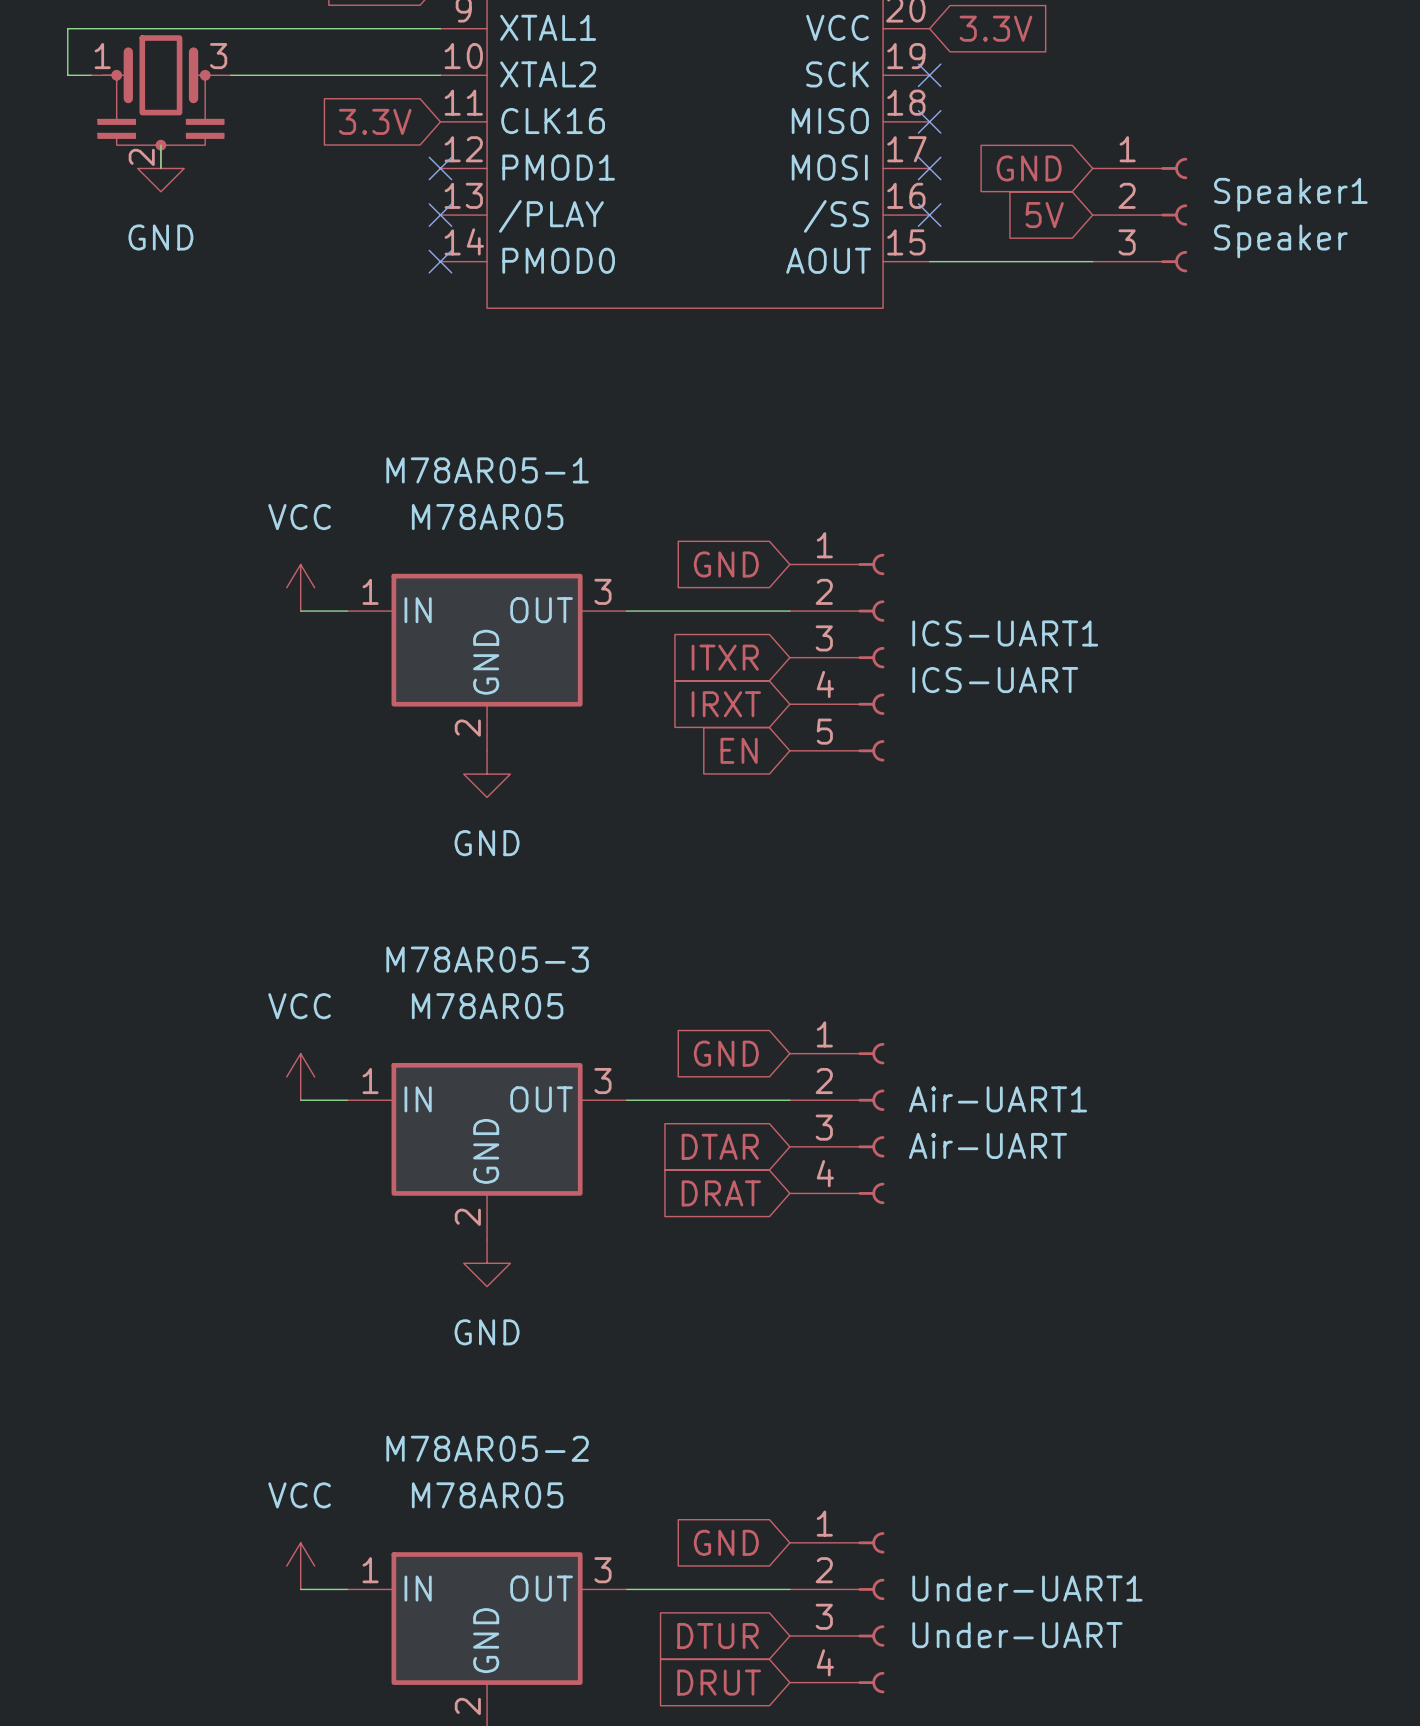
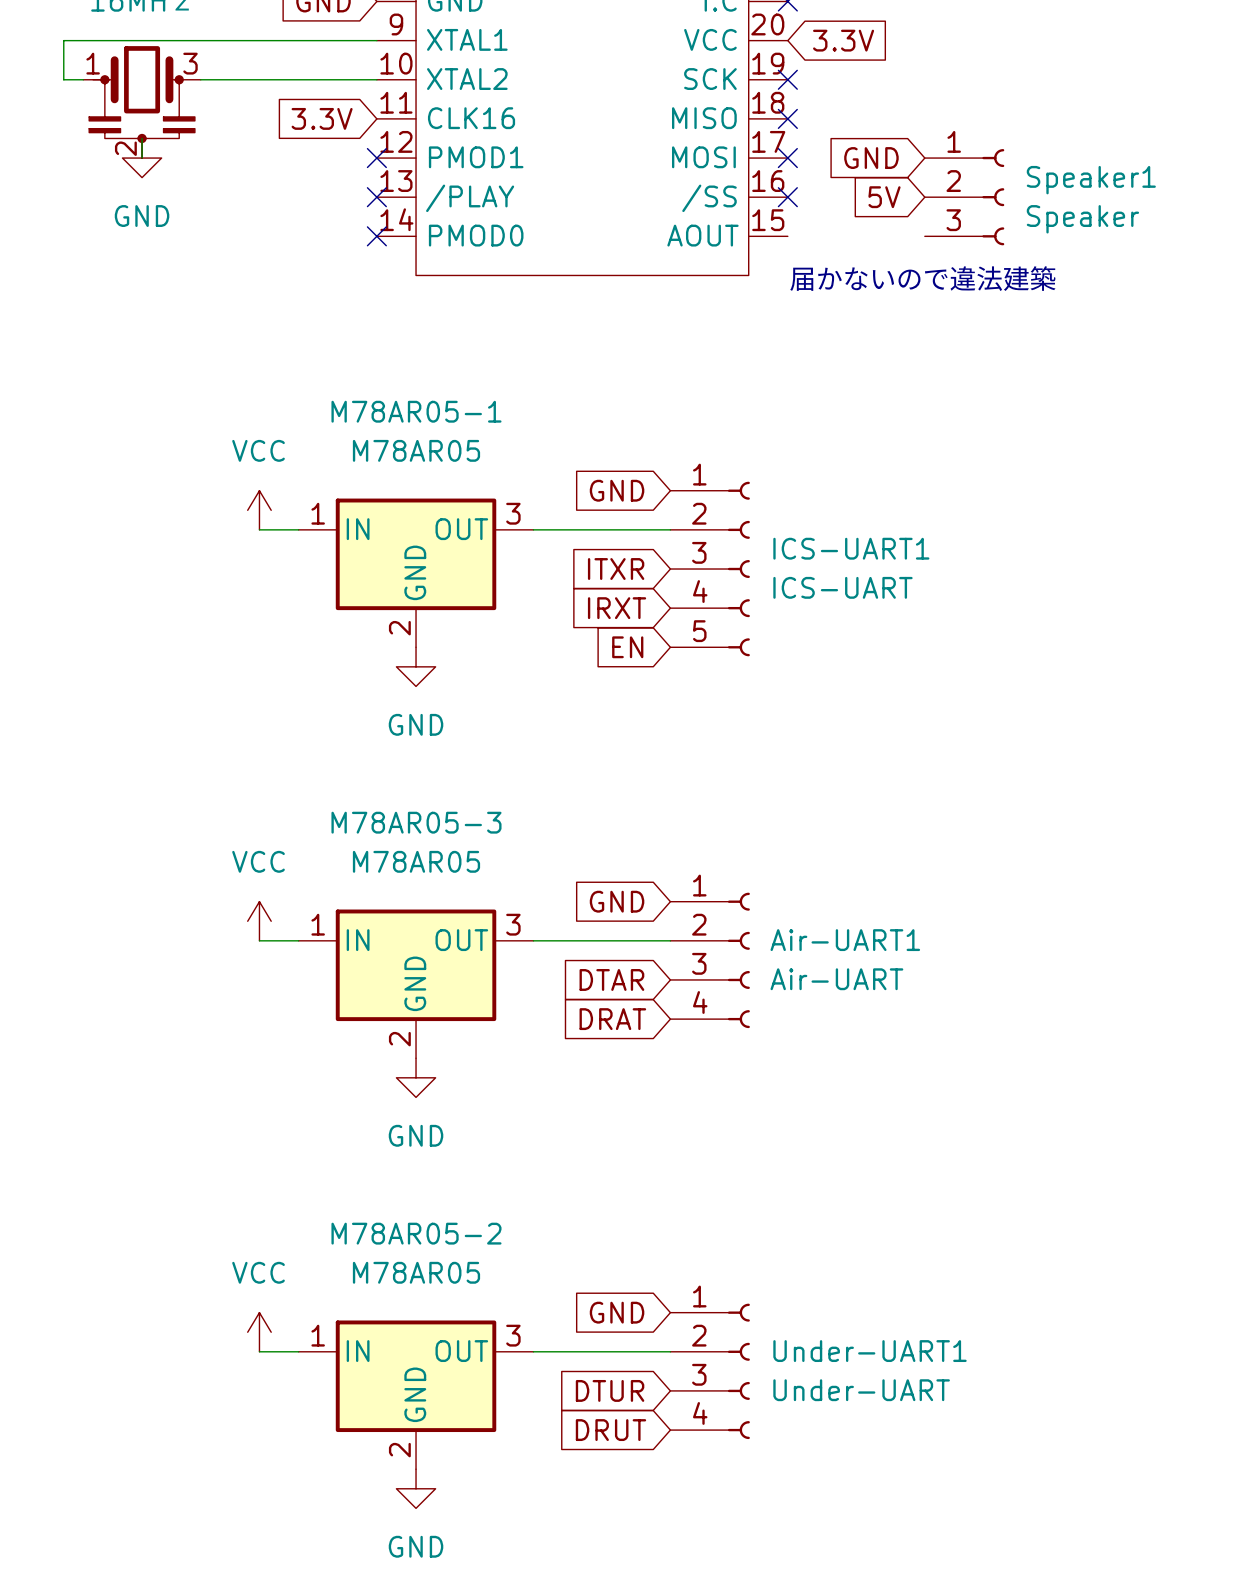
wire: (929, 261) (1092, 261) -> none
text: none -> 届かないので違法建築 (922, 278)

